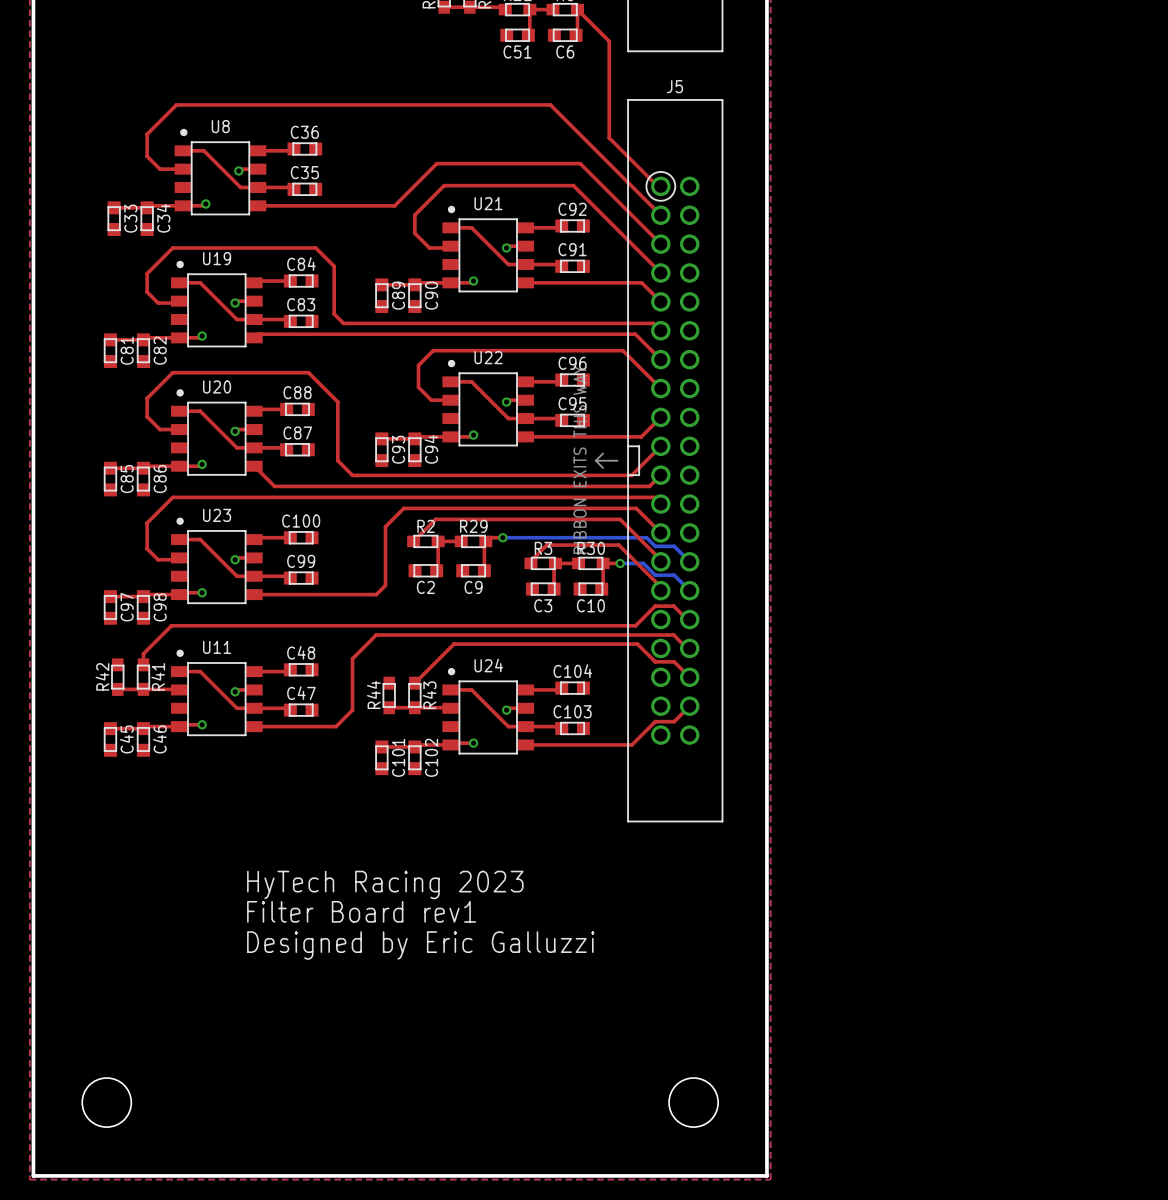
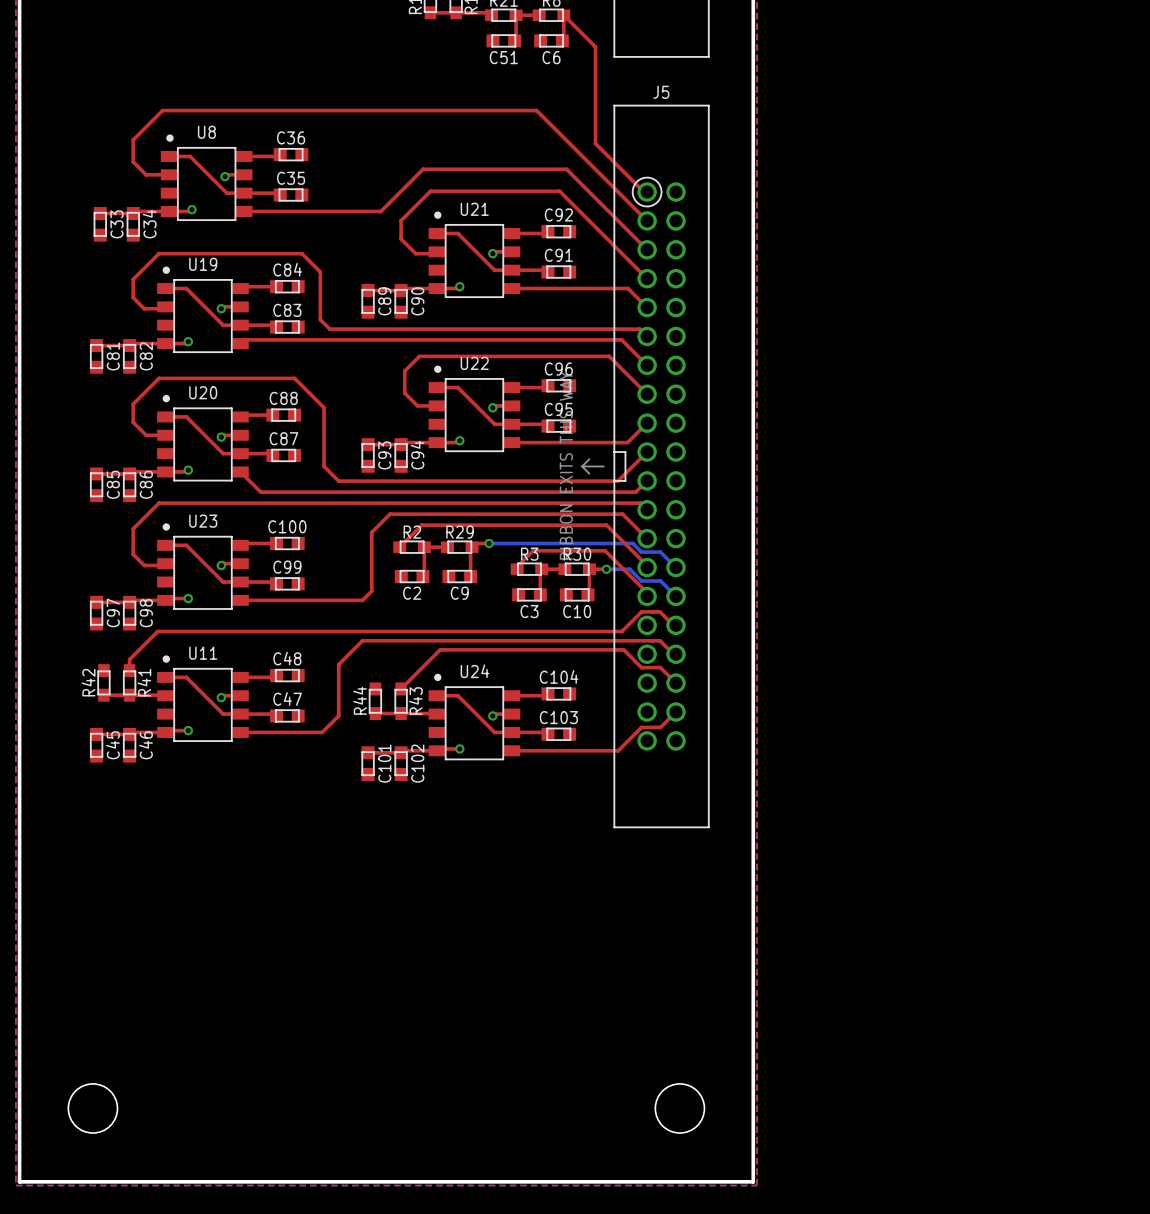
text: HyTech Racing 2023 (385, 884) -> none
text: Filter Board rev1 (361, 911) -> none
text: Designed by Eric Galluzzi (420, 945) -> none

